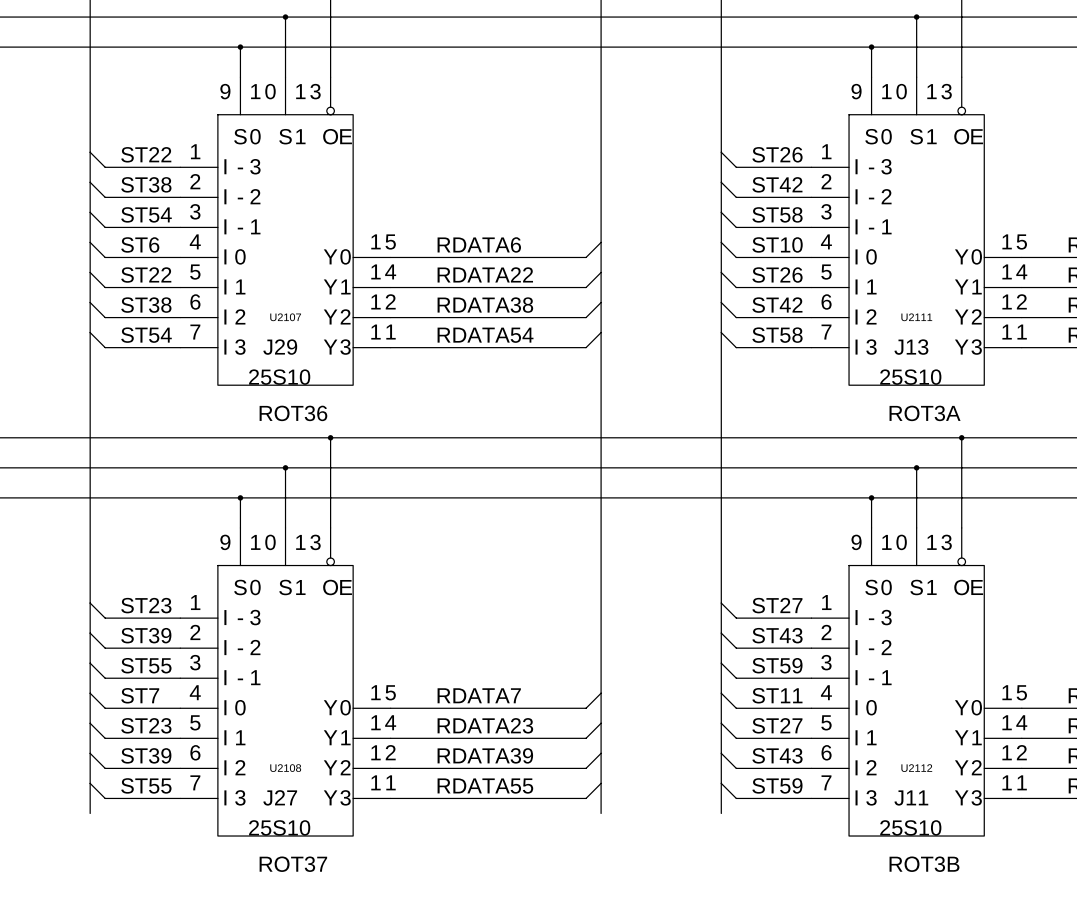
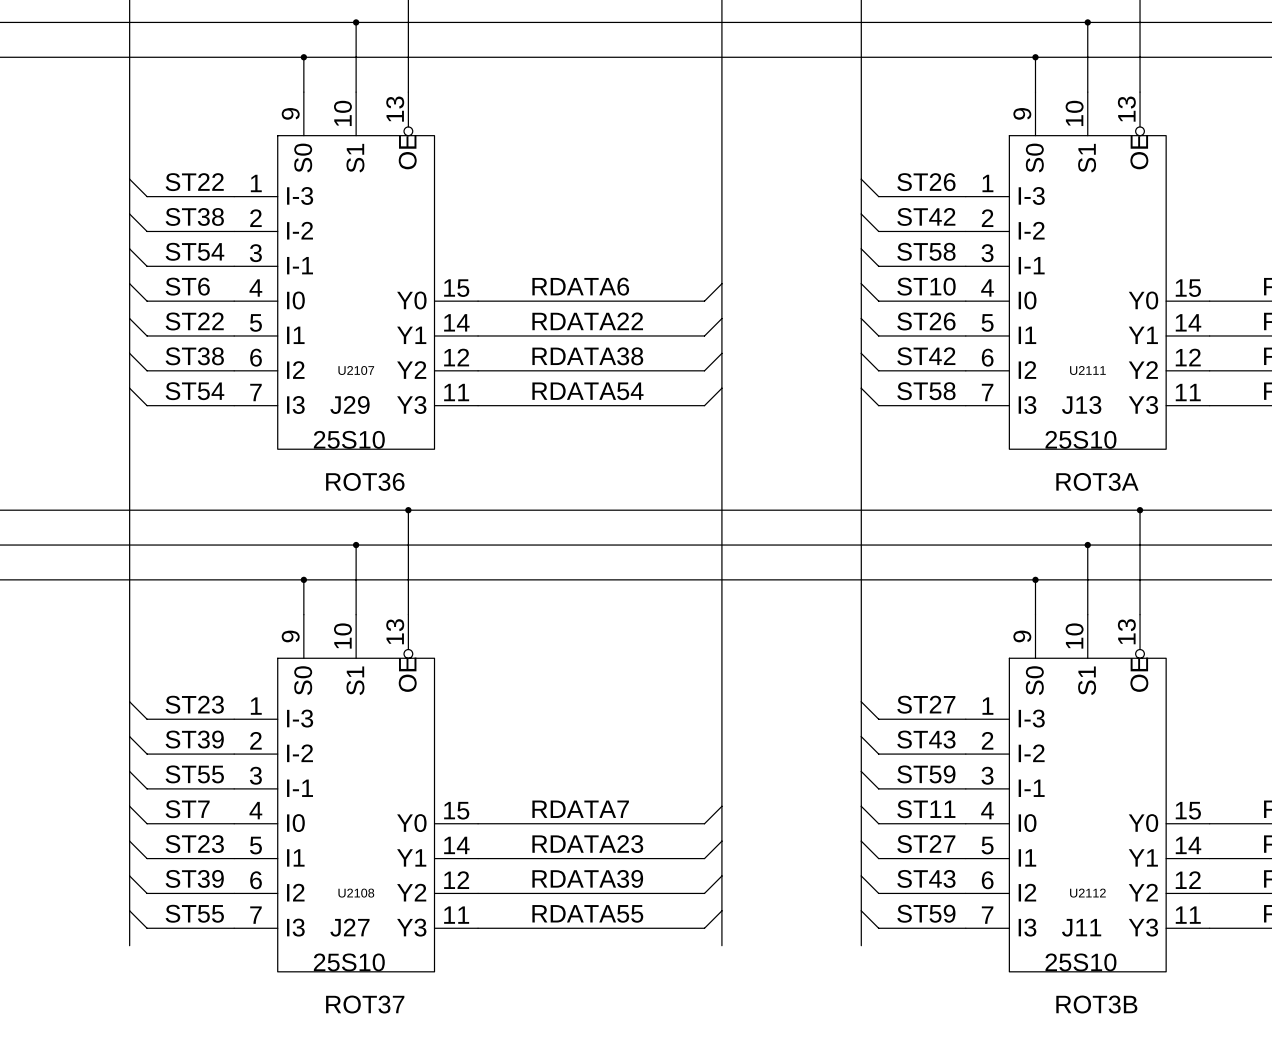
U2107 symbol: [180, 77, 391, 386] -> [234, 92, 479, 450]
U2111 symbol: [811, 77, 1022, 386] -> [965, 92, 1210, 450]
U2108 symbol: [180, 527, 391, 837] -> [234, 614, 479, 972]
U2112 symbol: [811, 527, 1022, 837] -> [965, 614, 1210, 972]

